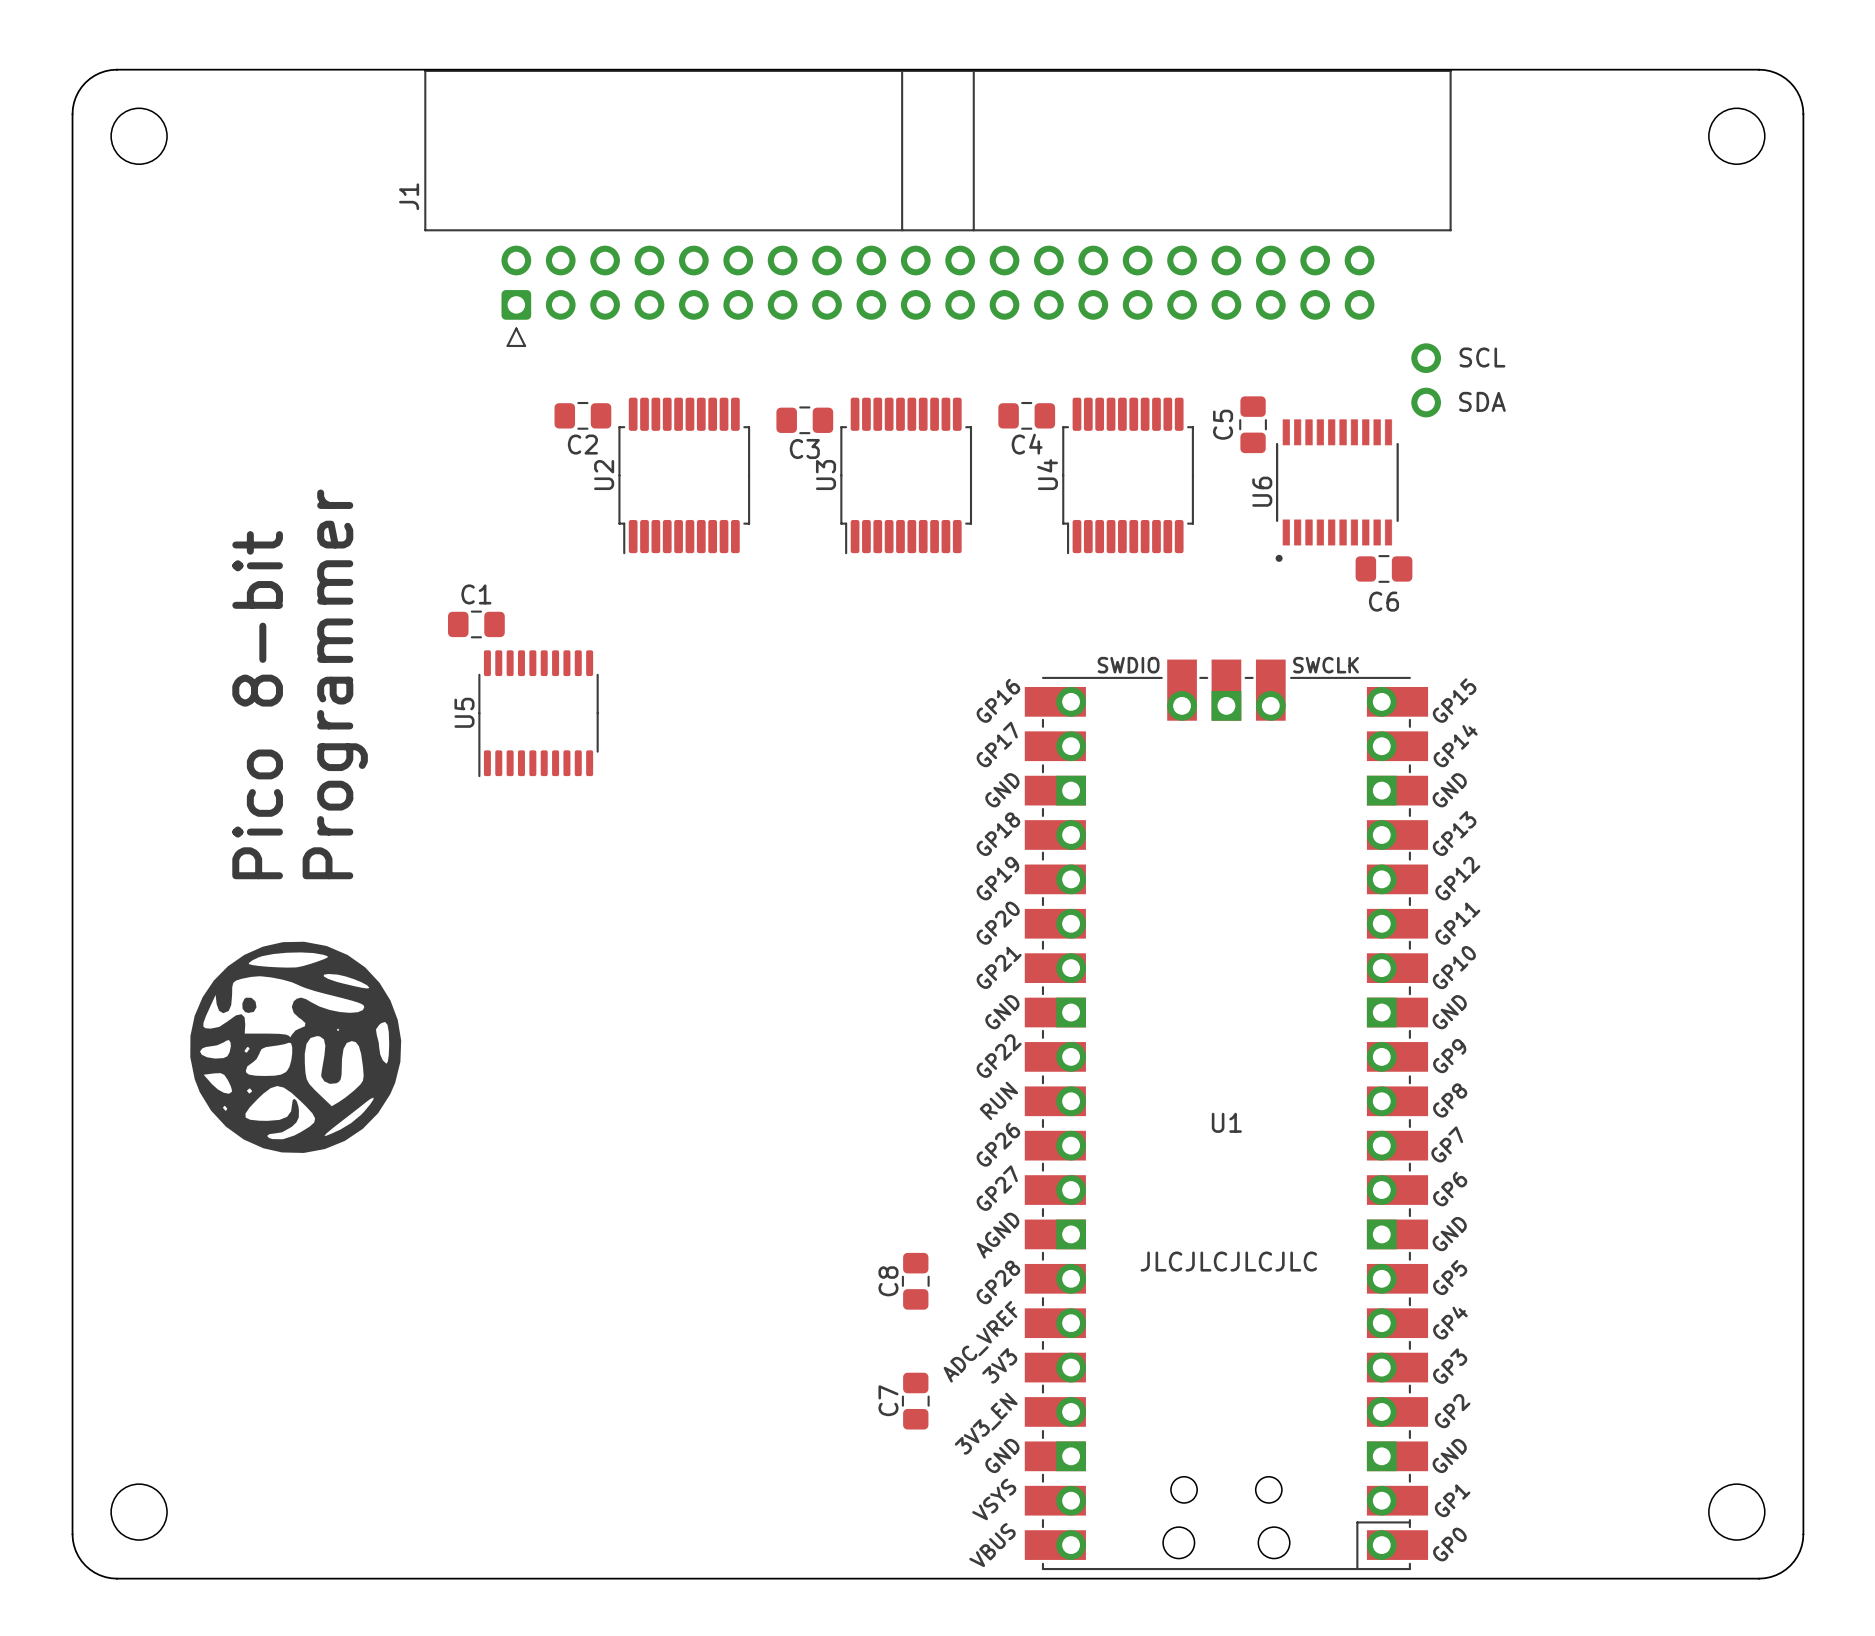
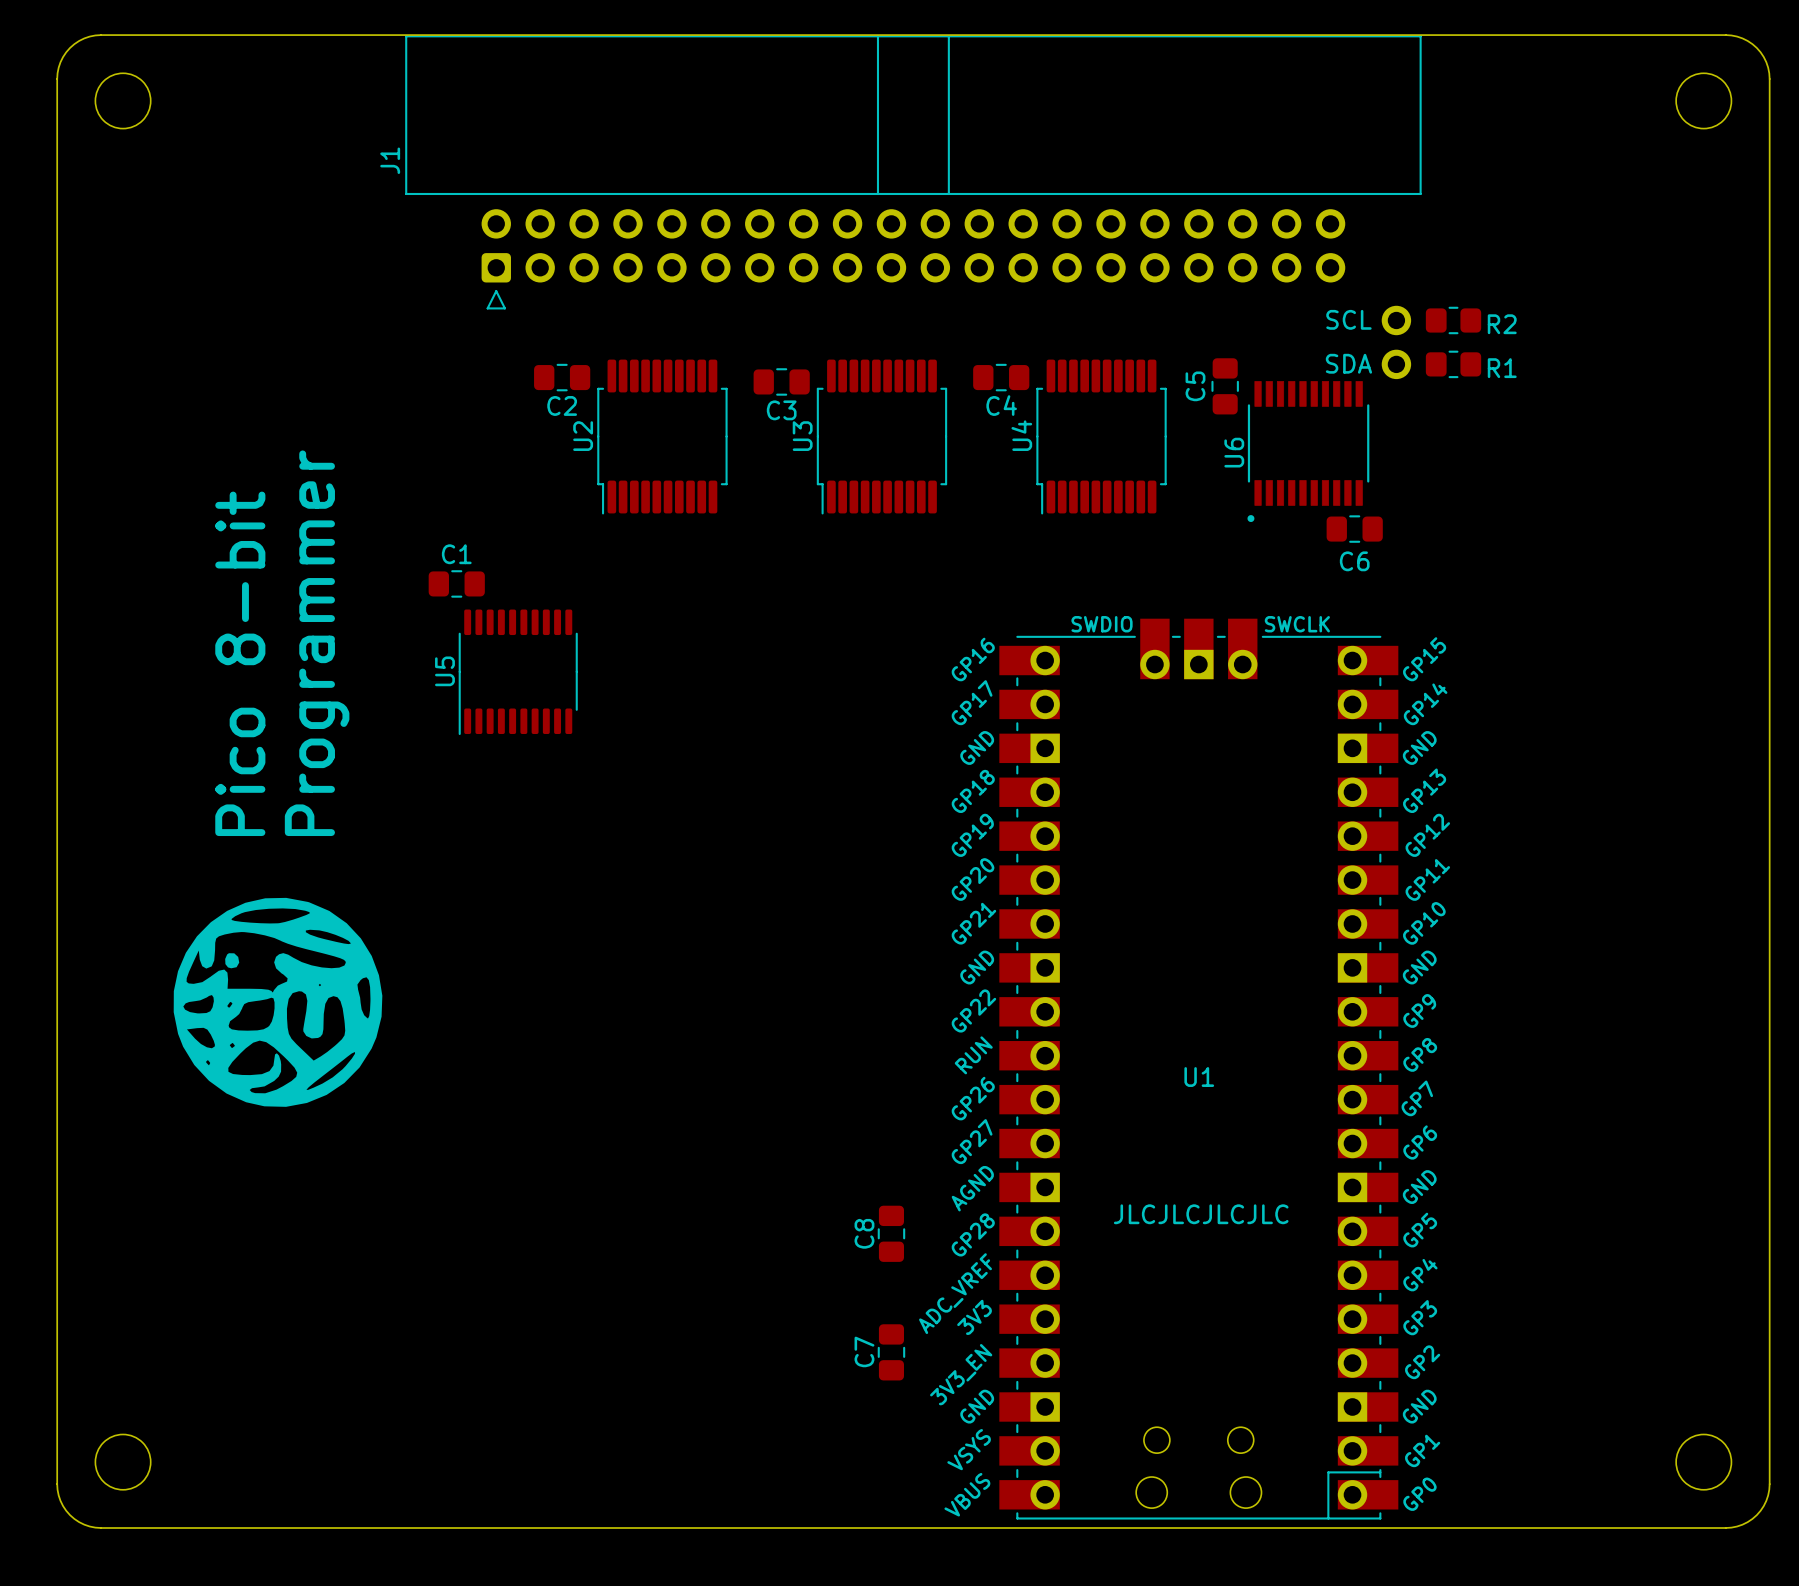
text position: SCL (1482, 357) -> SCL (1348, 319)
R2: none -> (1453, 320)
text position: SDA (1482, 401) -> SDA (1348, 363)
R1: none -> (1453, 364)

